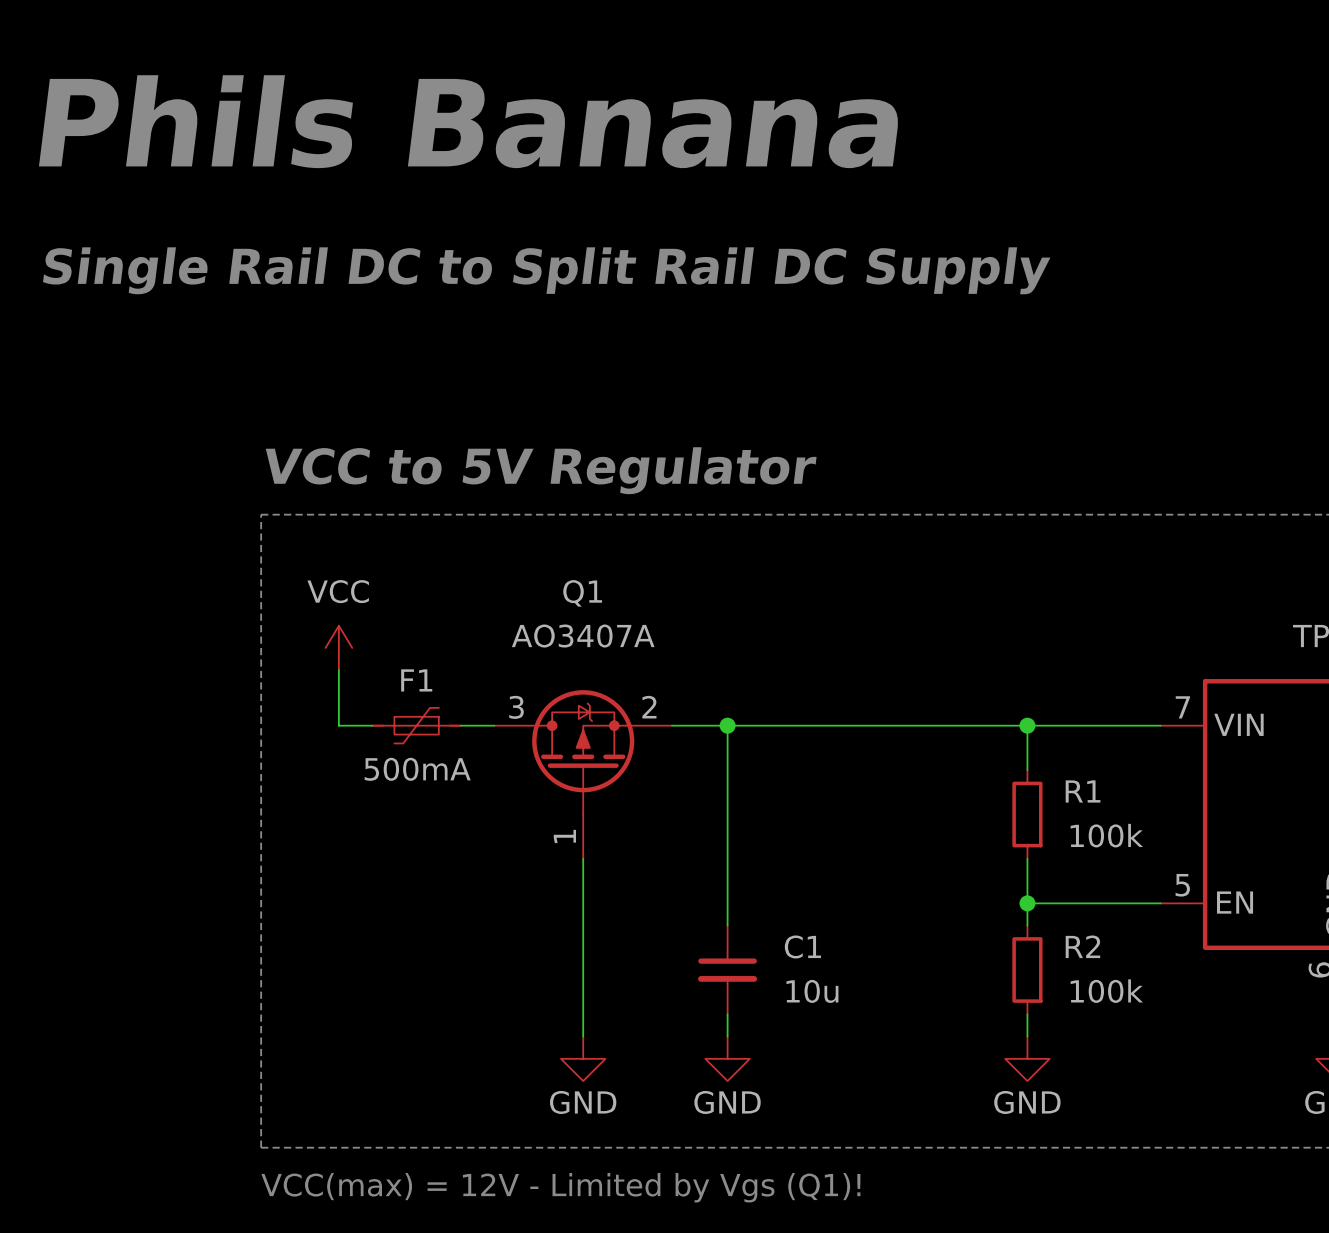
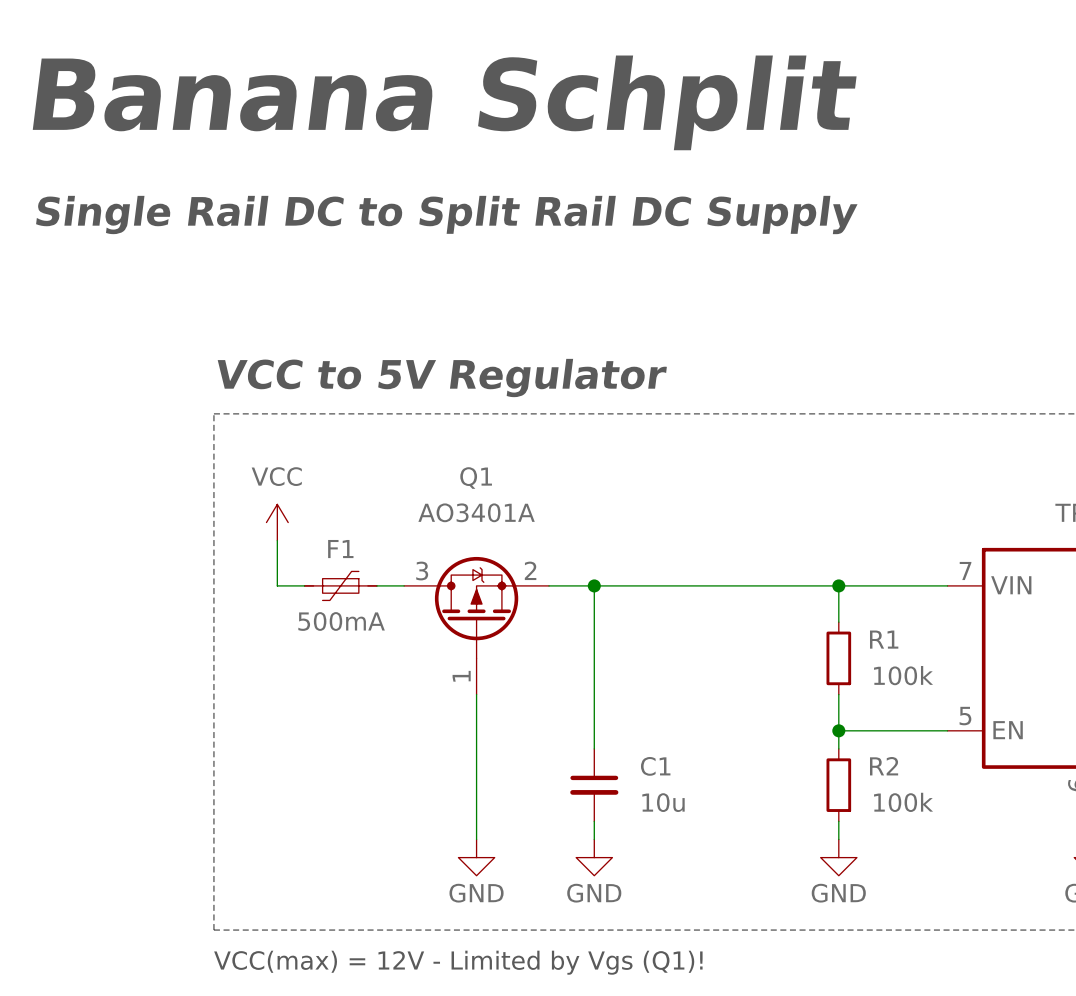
text: Phils Banana (469, 121) -> Banana Schplit (444, 102)
Q1 value: AO3407A (583, 636) -> AO3401A (476, 512)

